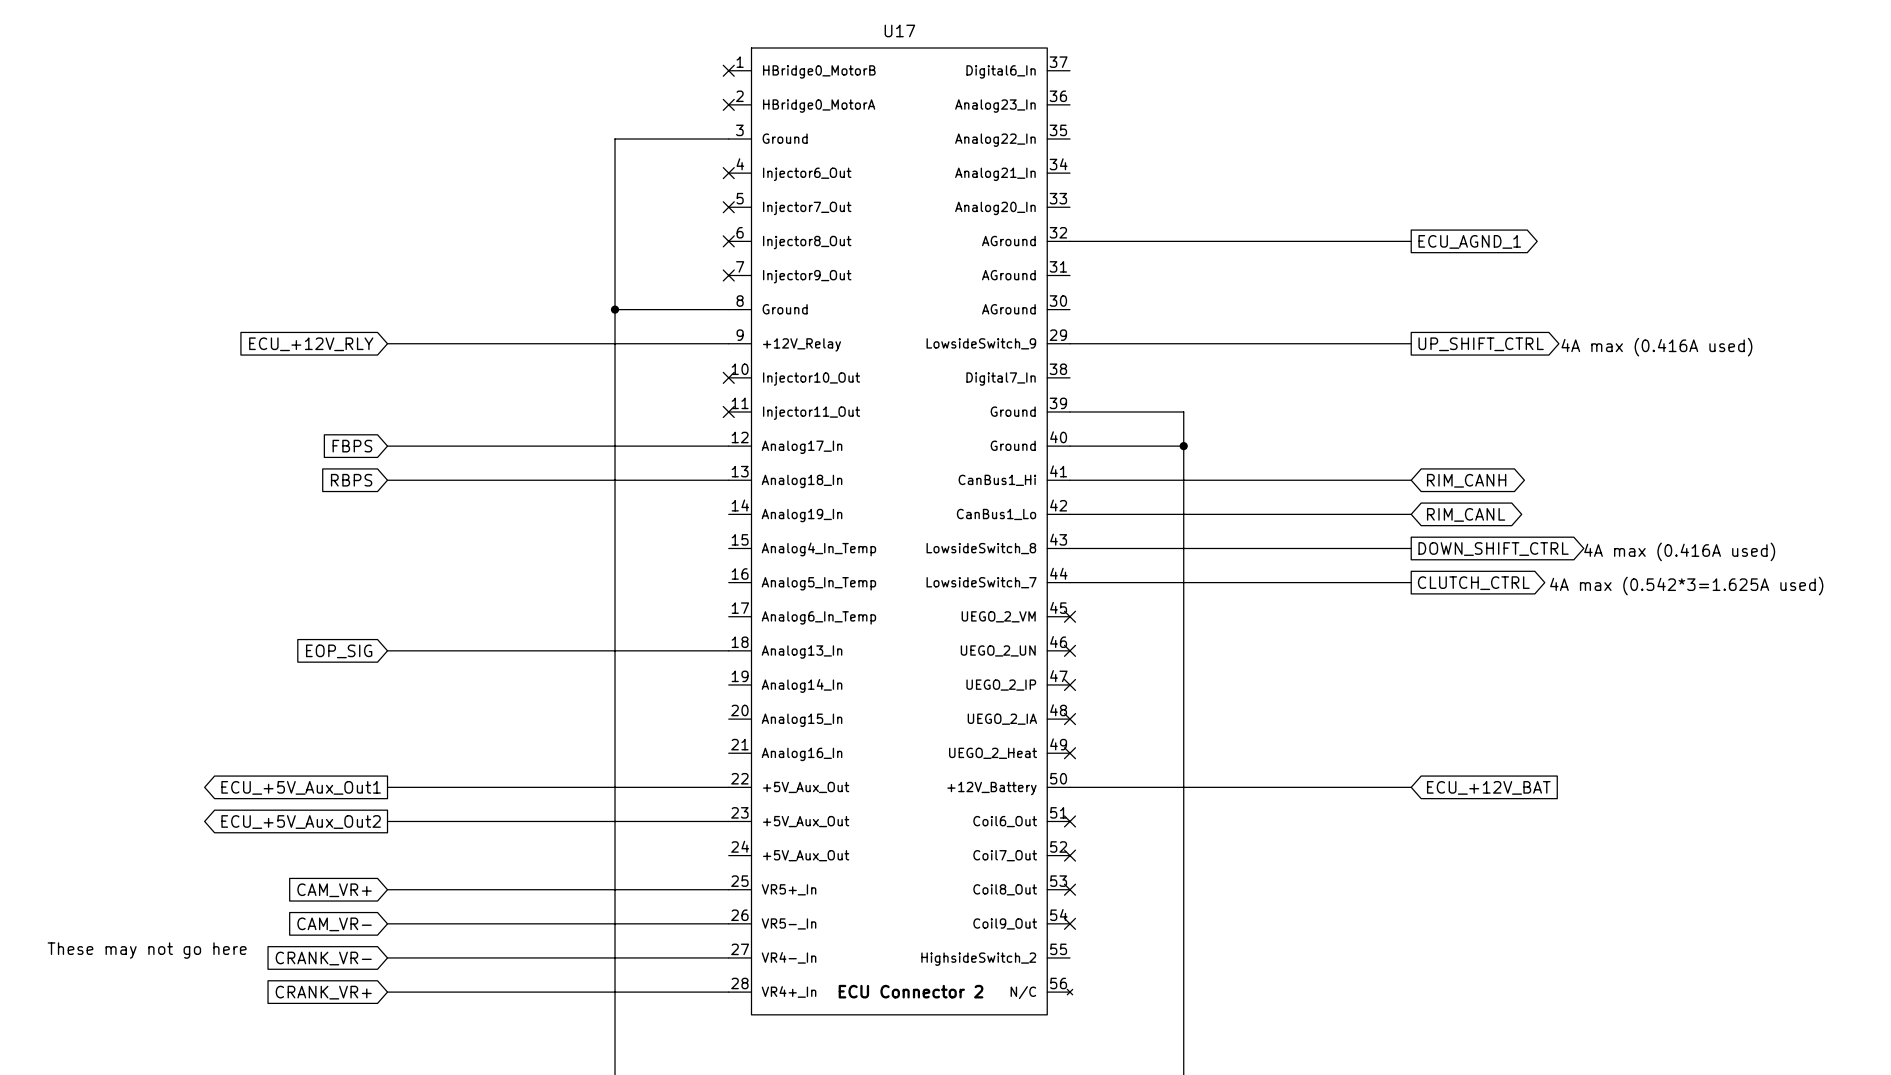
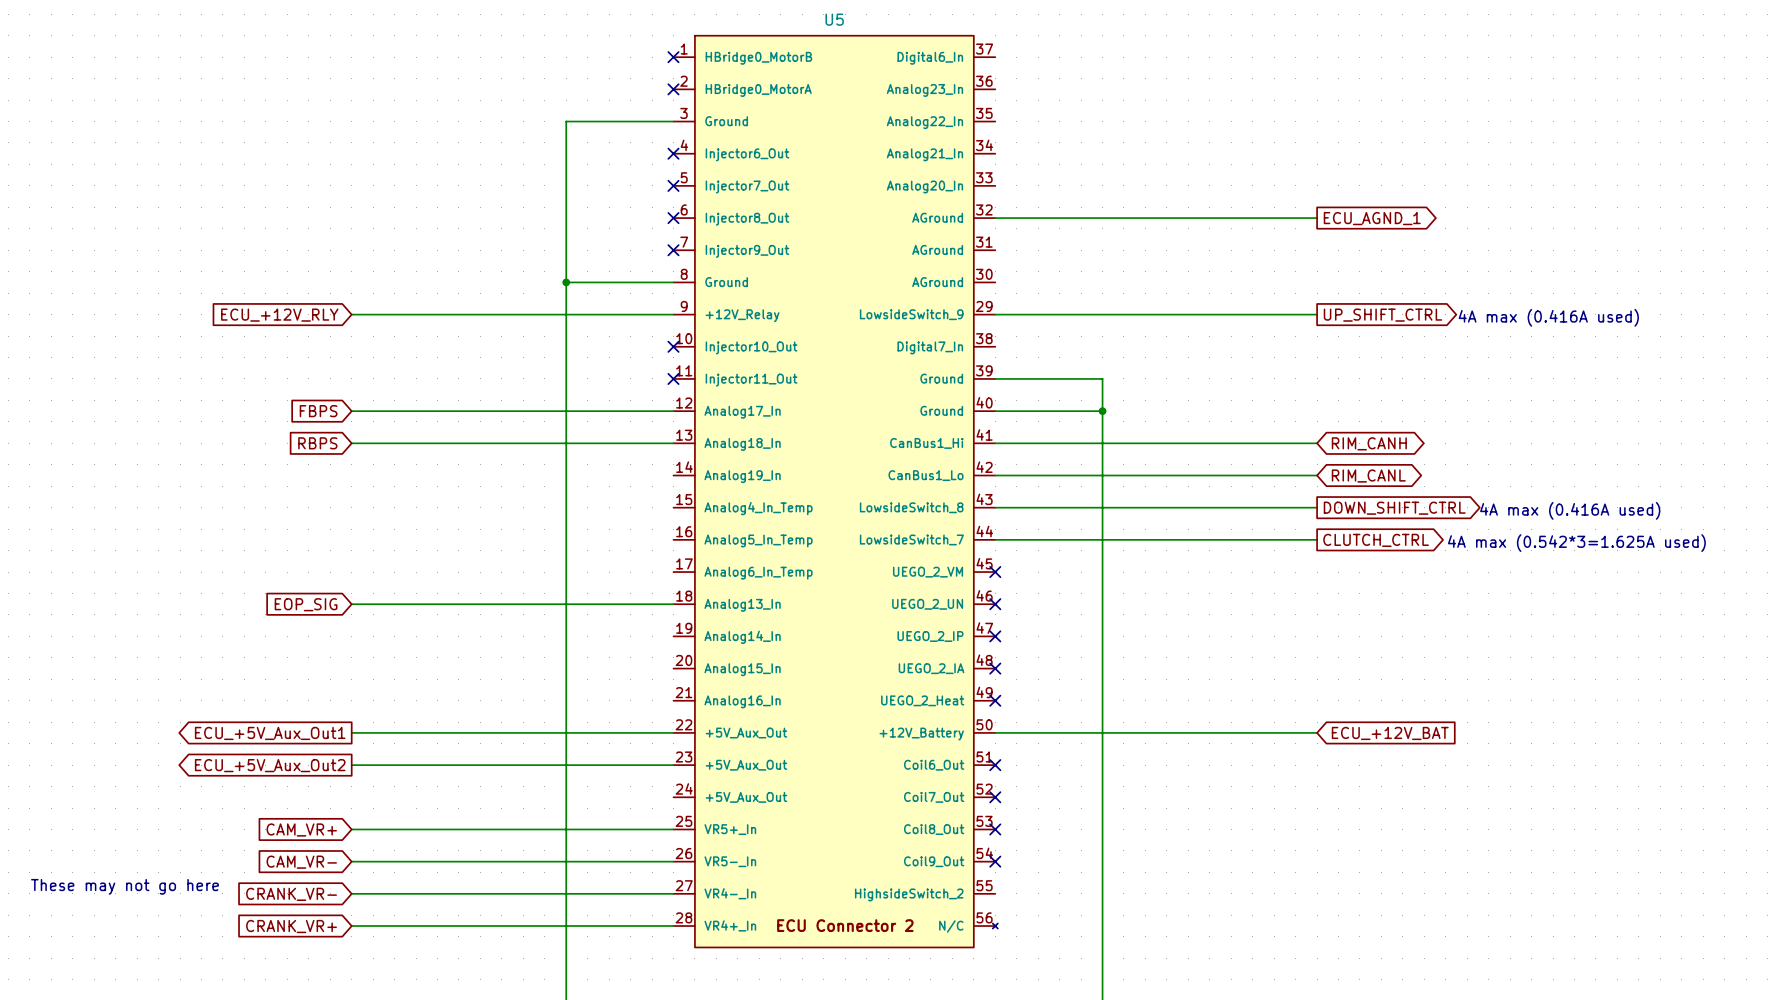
U17 name: U17 (899, 30) -> U5 (834, 19)

